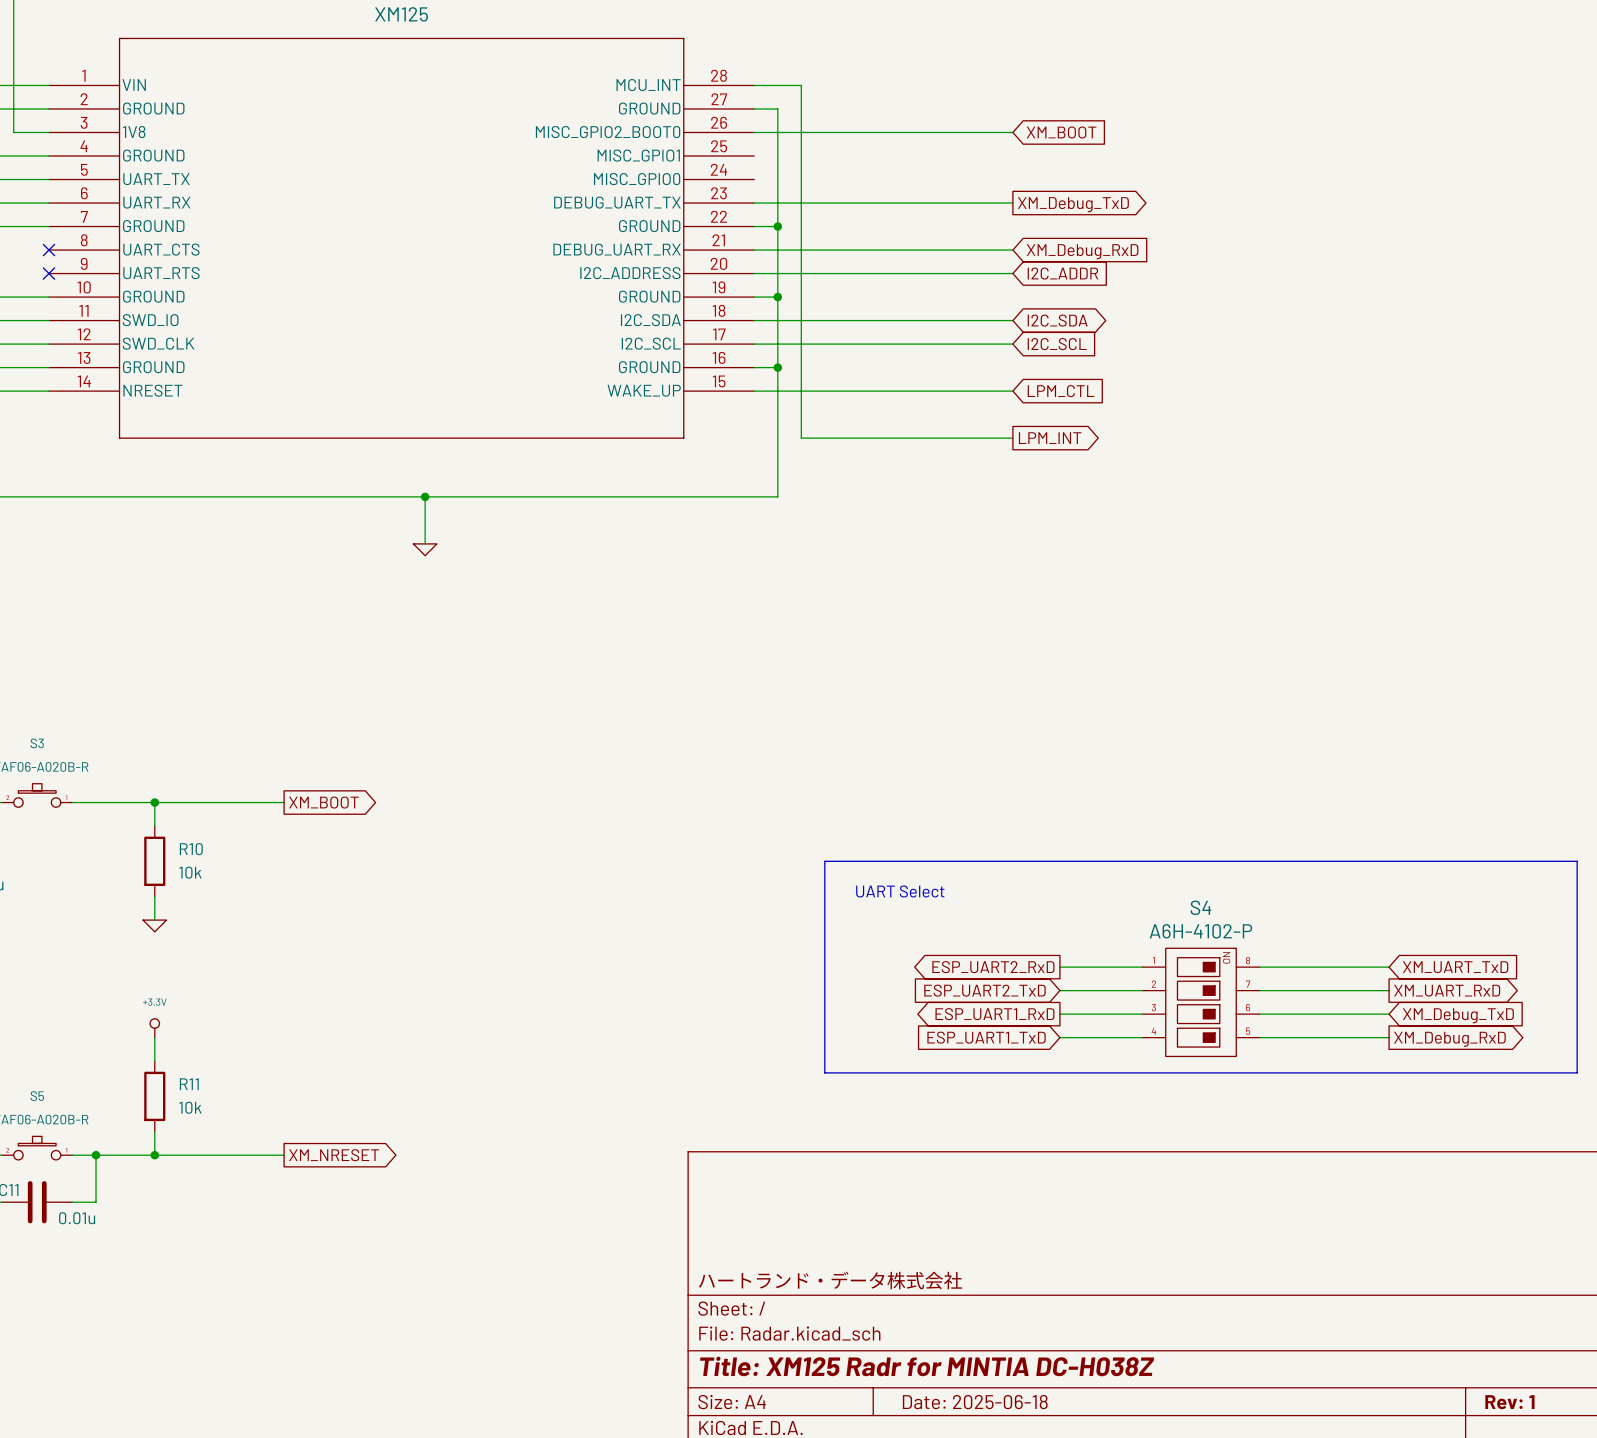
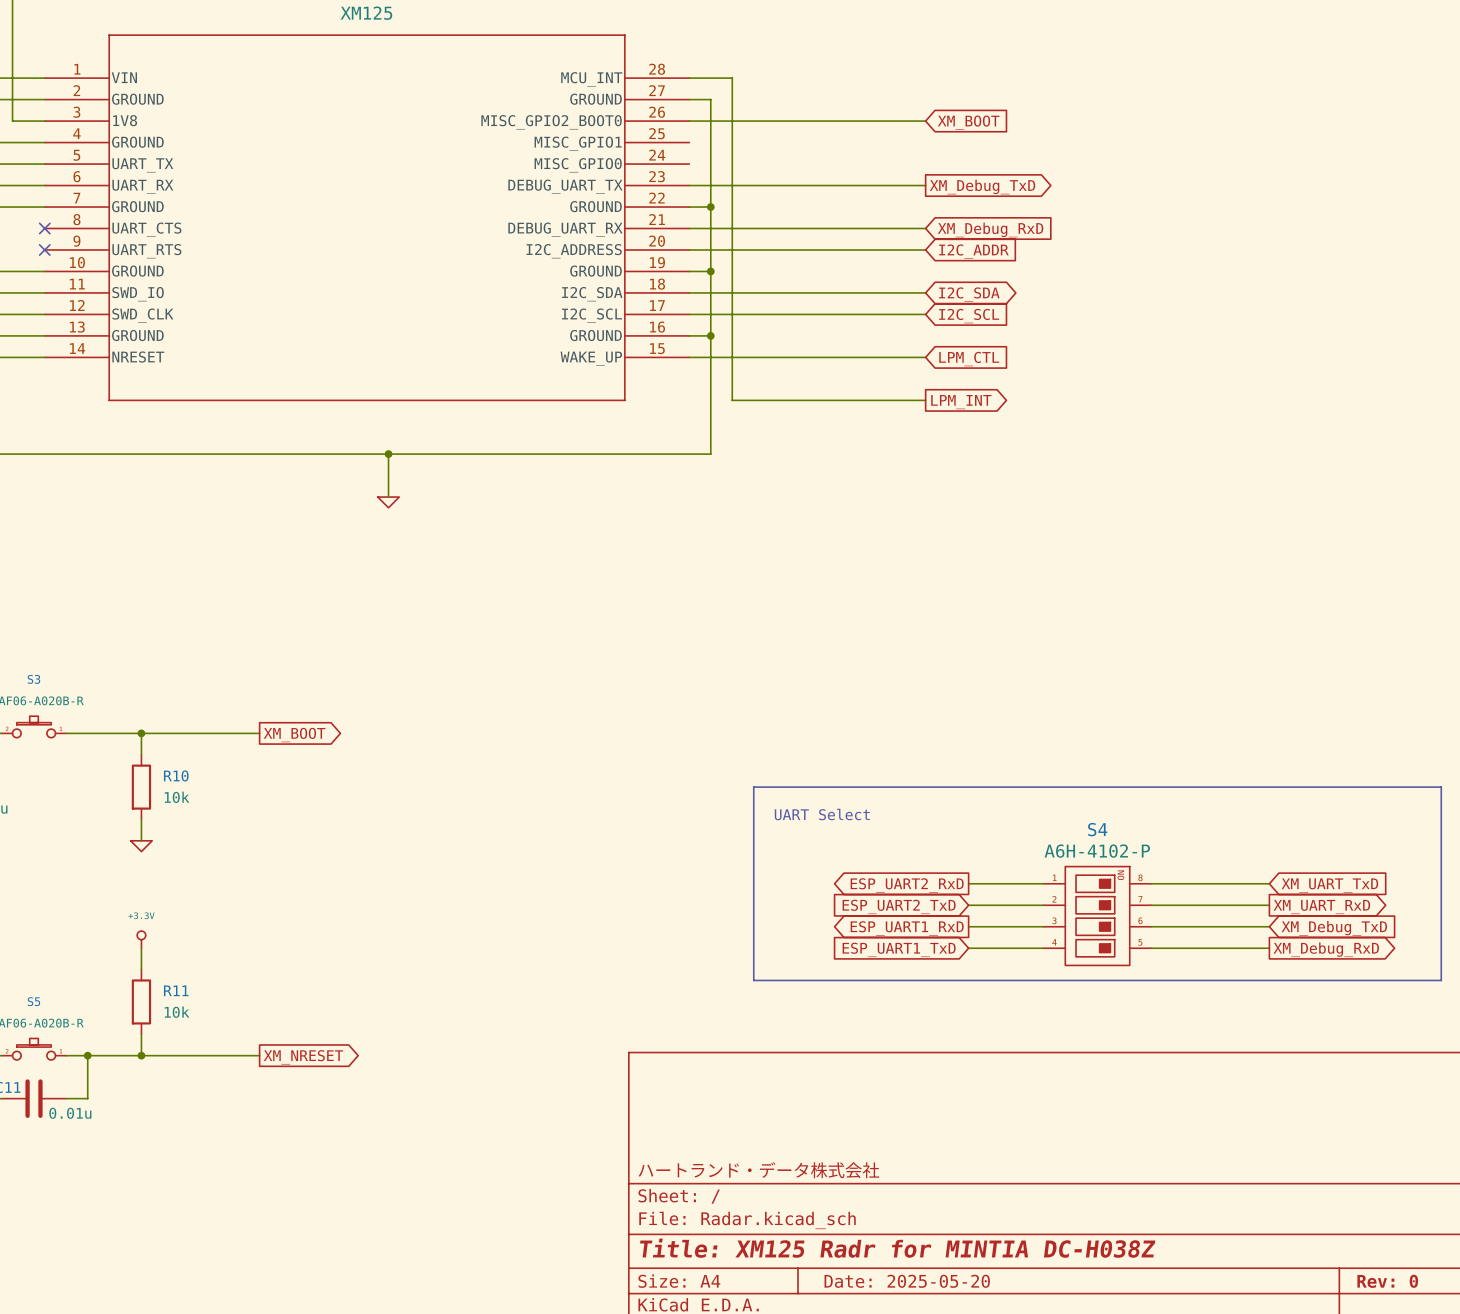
title block: Date: 2025-06-18 (975, 1402) -> Date: 2025-05-20 (907, 1281)
title block: Rev: 1 (1509, 1402) -> Rev: 0 (1387, 1281)

